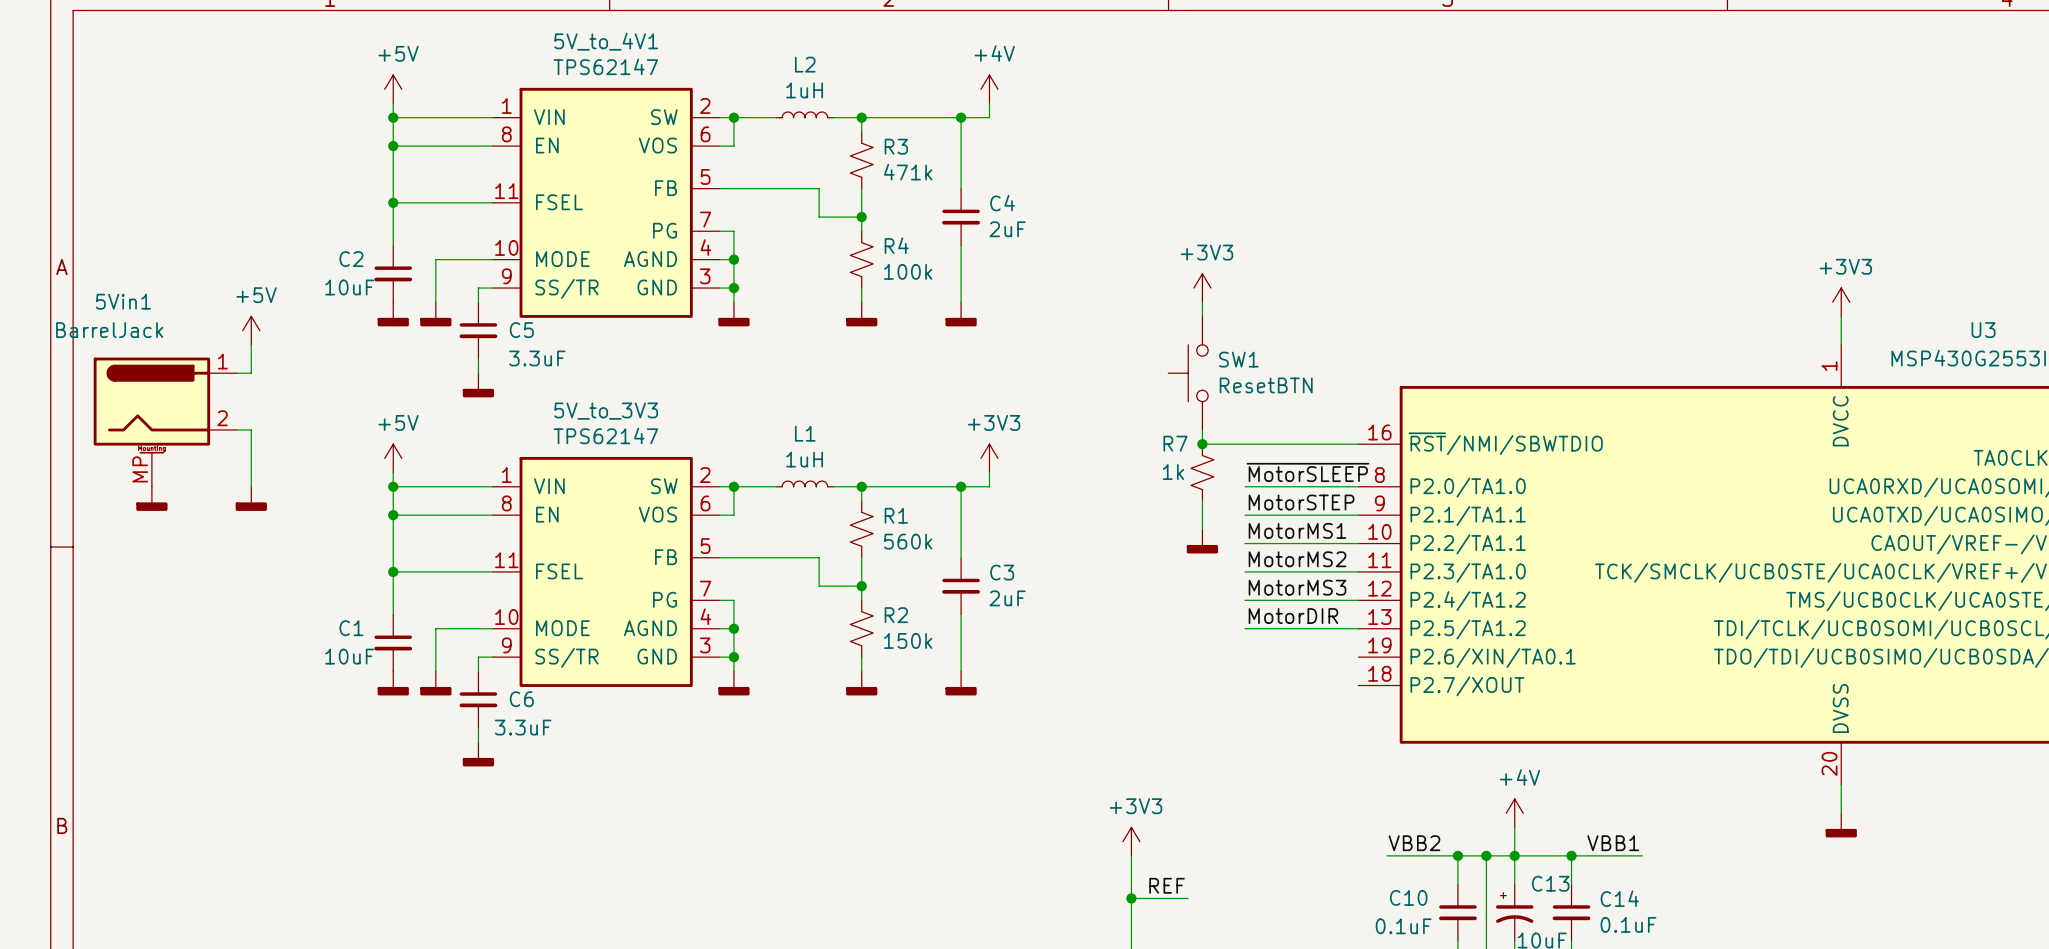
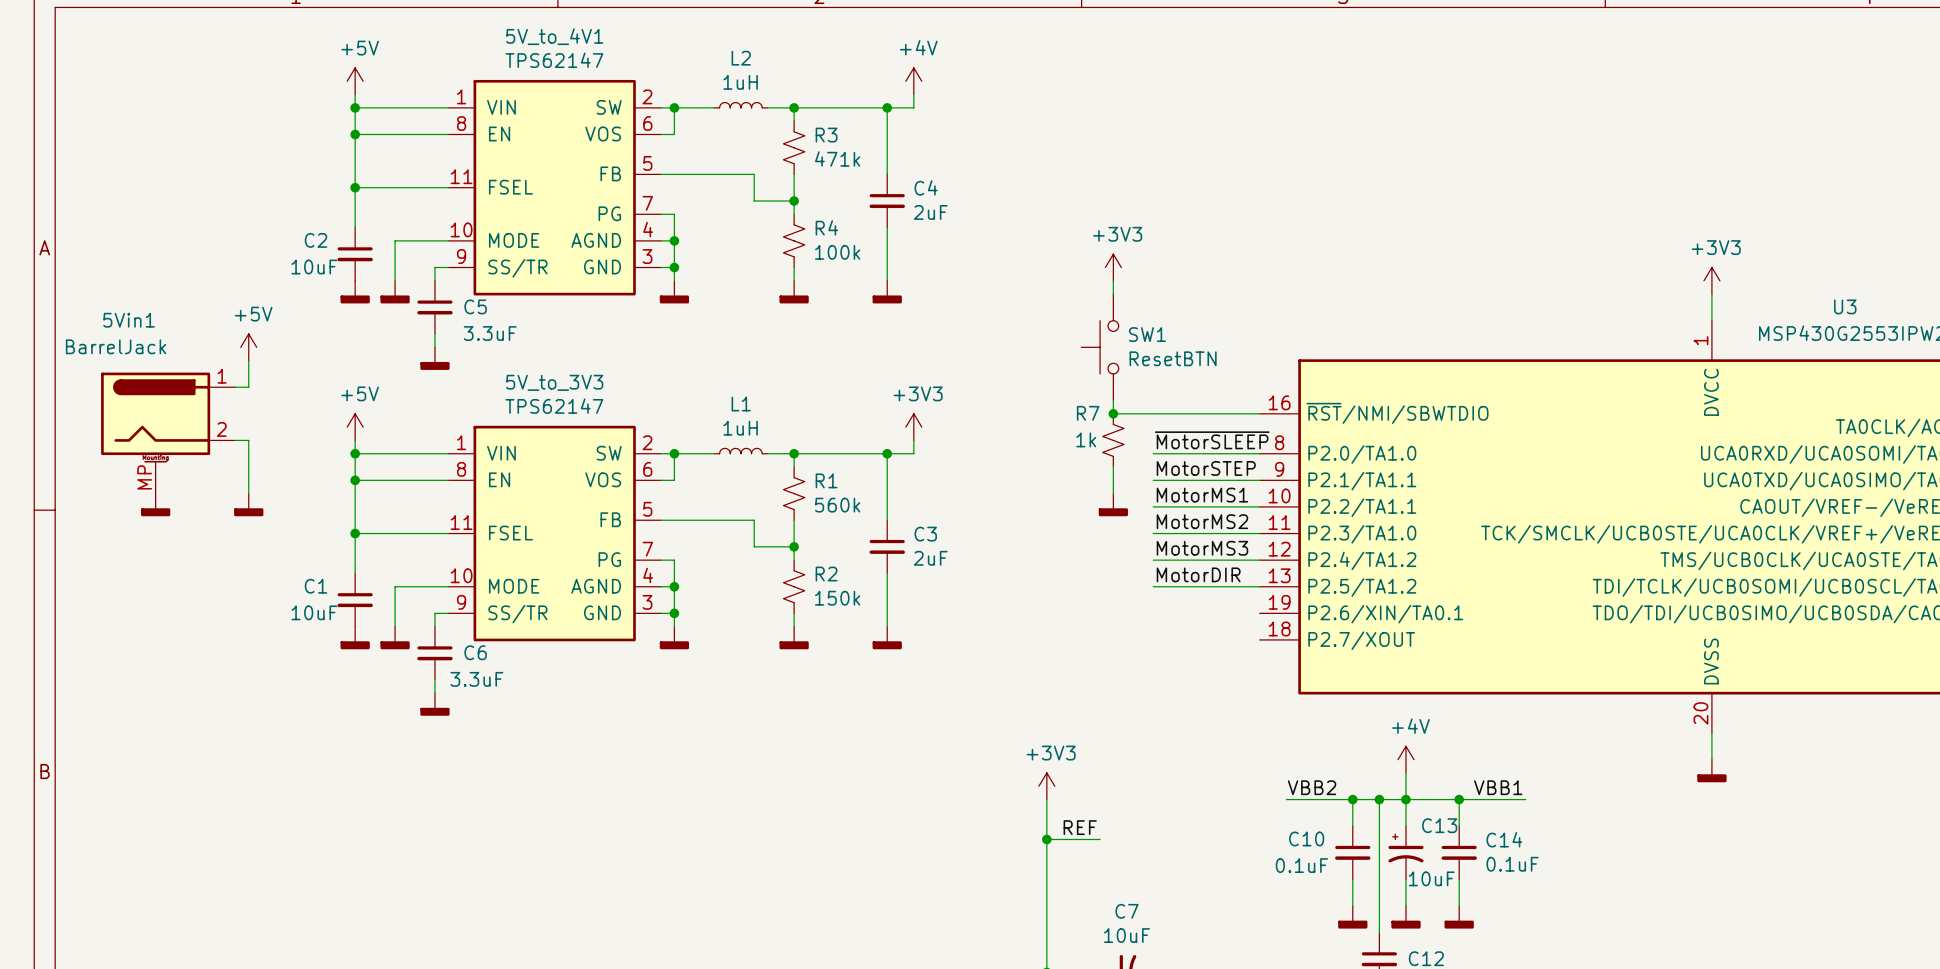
power symbol position: +5V (251, 330) -> +5V (248, 347)
wire: (251, 344) (251, 373) (237, 373) -> (248, 360) (248, 387) (235, 387)
5Vin1 position: (165, 422) -> (168, 433)
wire: (237, 429) (251, 429) (251, 486) -> (235, 440) (248, 440) (248, 493)
power symbol: (151, 498) -> none
power symbol: (251, 498) -> none
power symbol: none -> (155, 504)
power symbol: none -> (248, 504)

